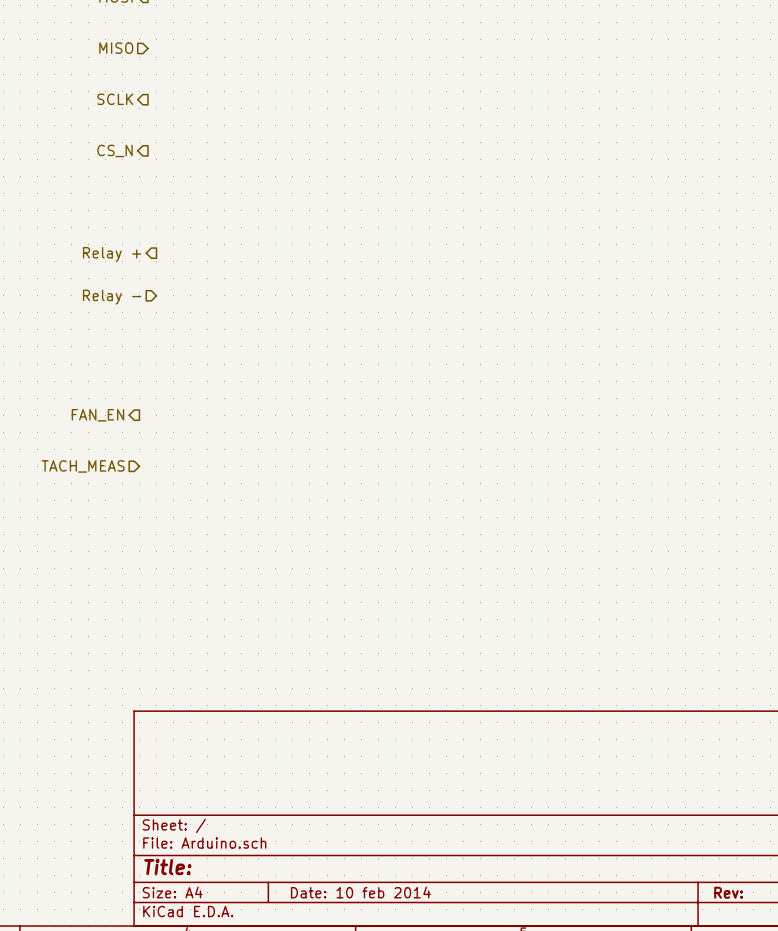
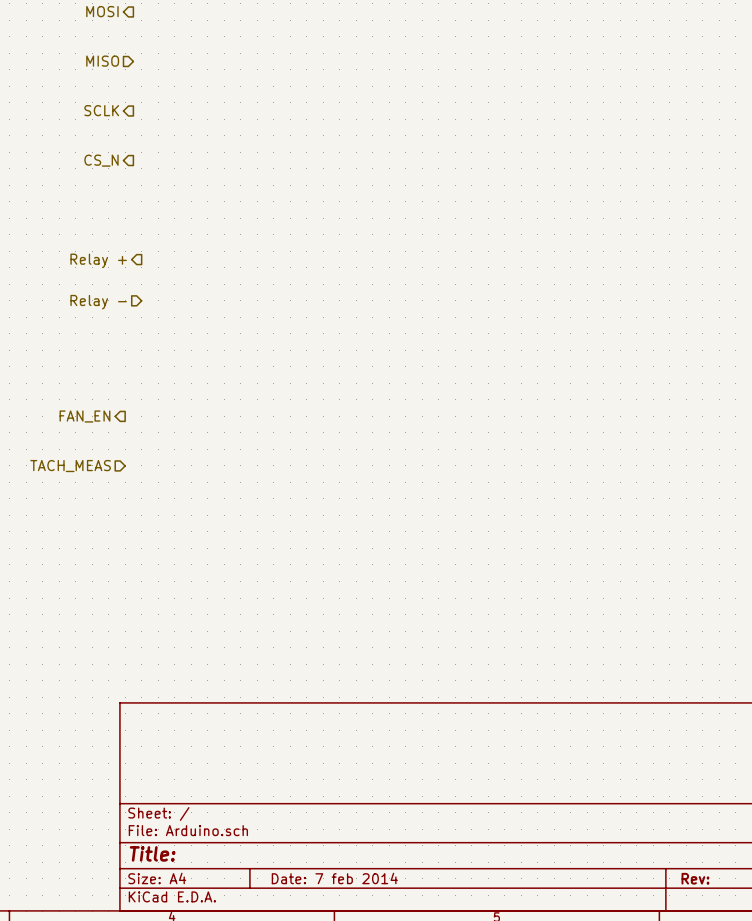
title block: Date: 10 feb 2014 (360, 892) -> Date: 7 feb 2014 (334, 878)

